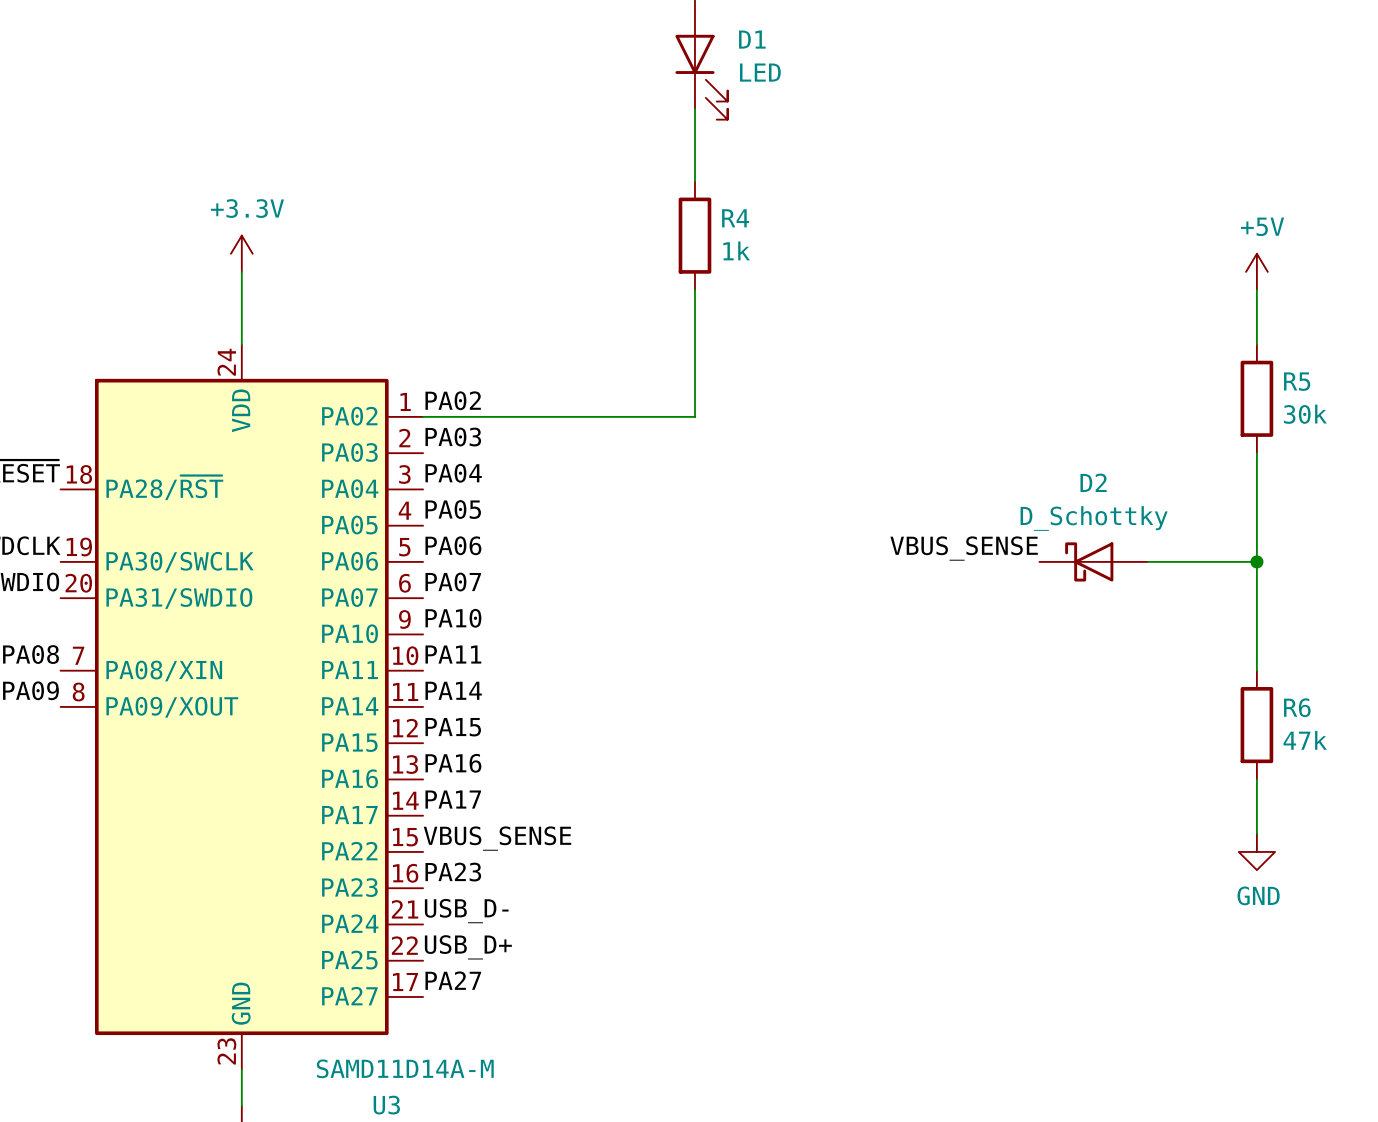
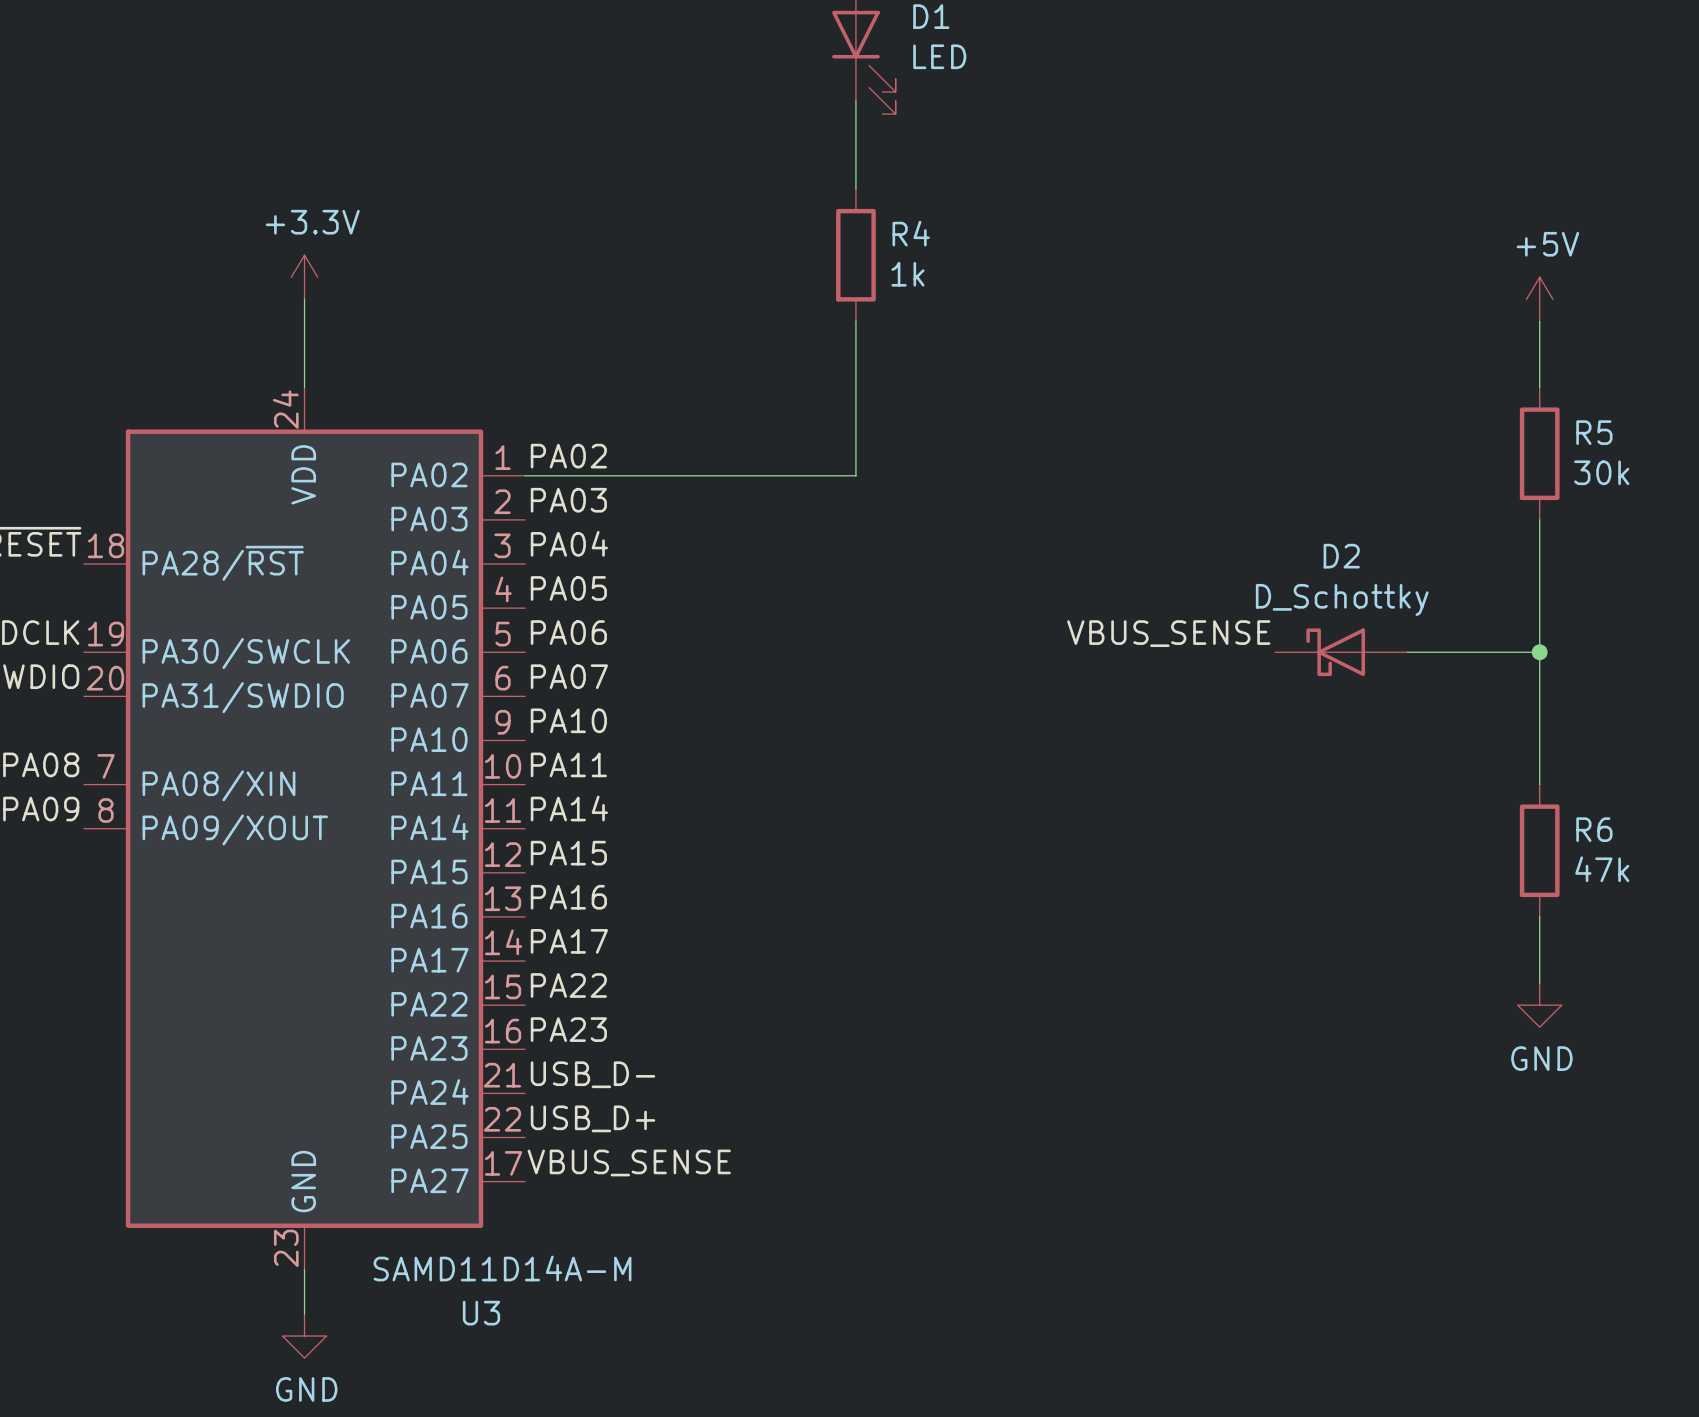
label: VBUS_SENSE (497, 838) -> PA22 (568, 985)
label: PA27 (453, 980) -> VBUS_SENSE (629, 1162)

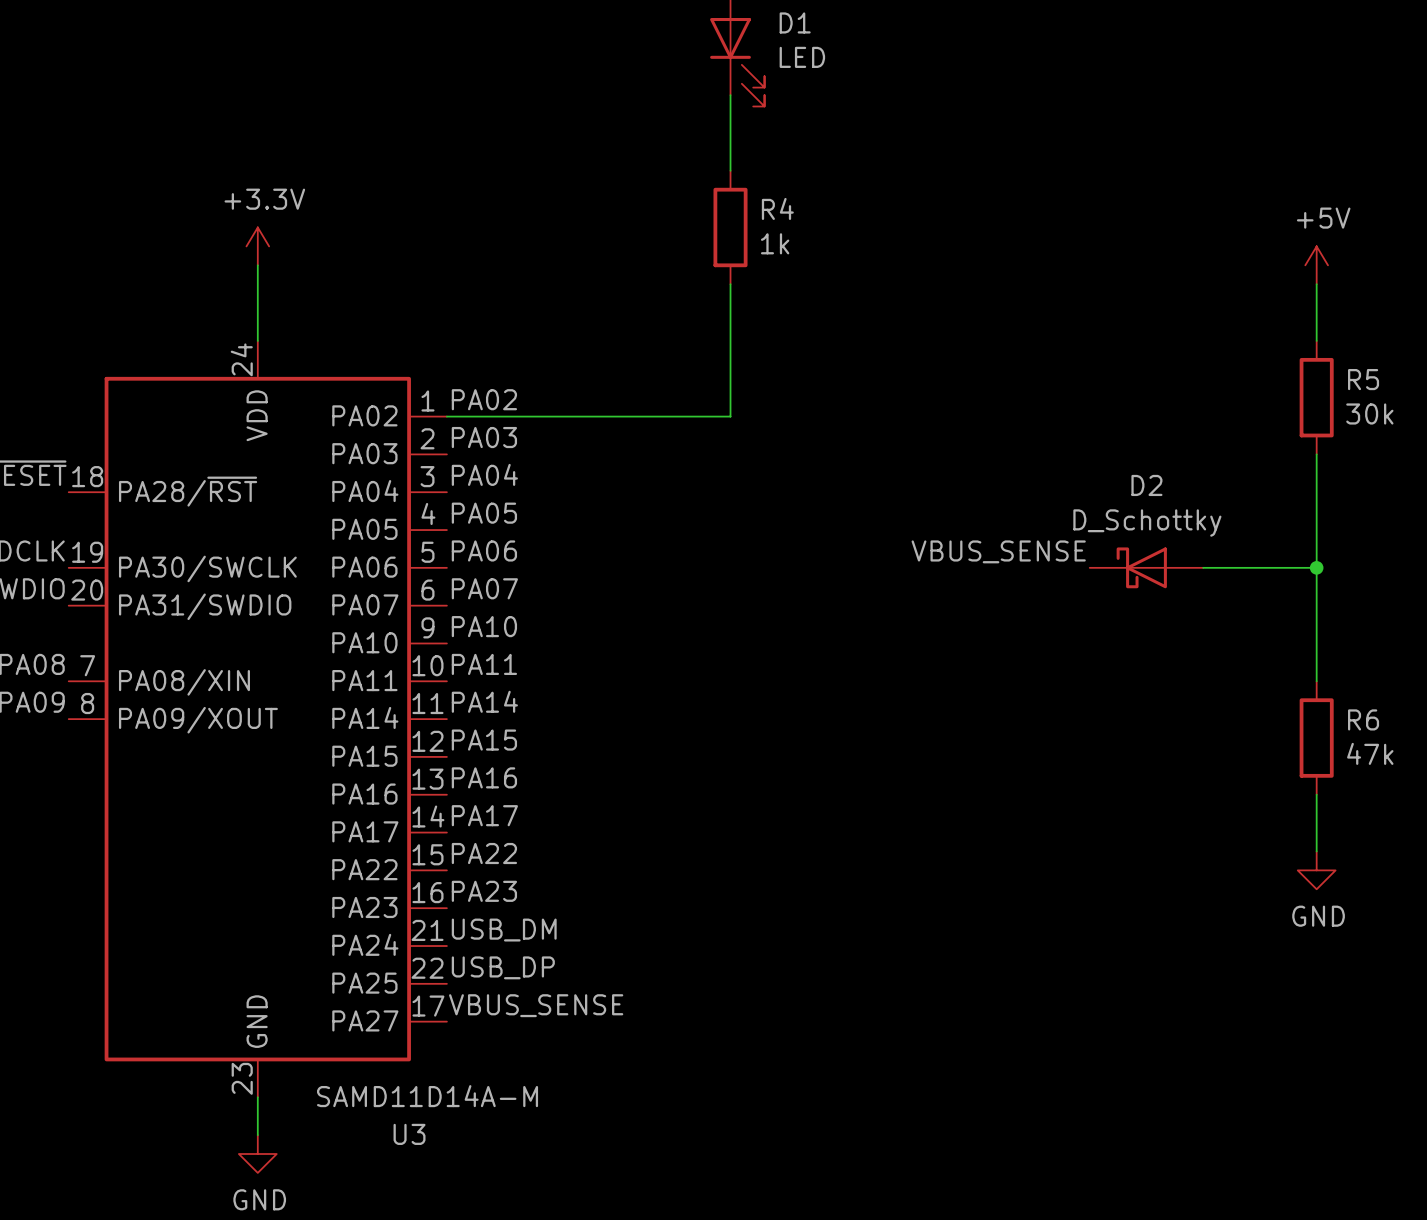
label: USB_D- (593, 1074) -> USB_DM (504, 930)
label: USB_D+ (593, 1118) -> USB_DP (503, 967)

